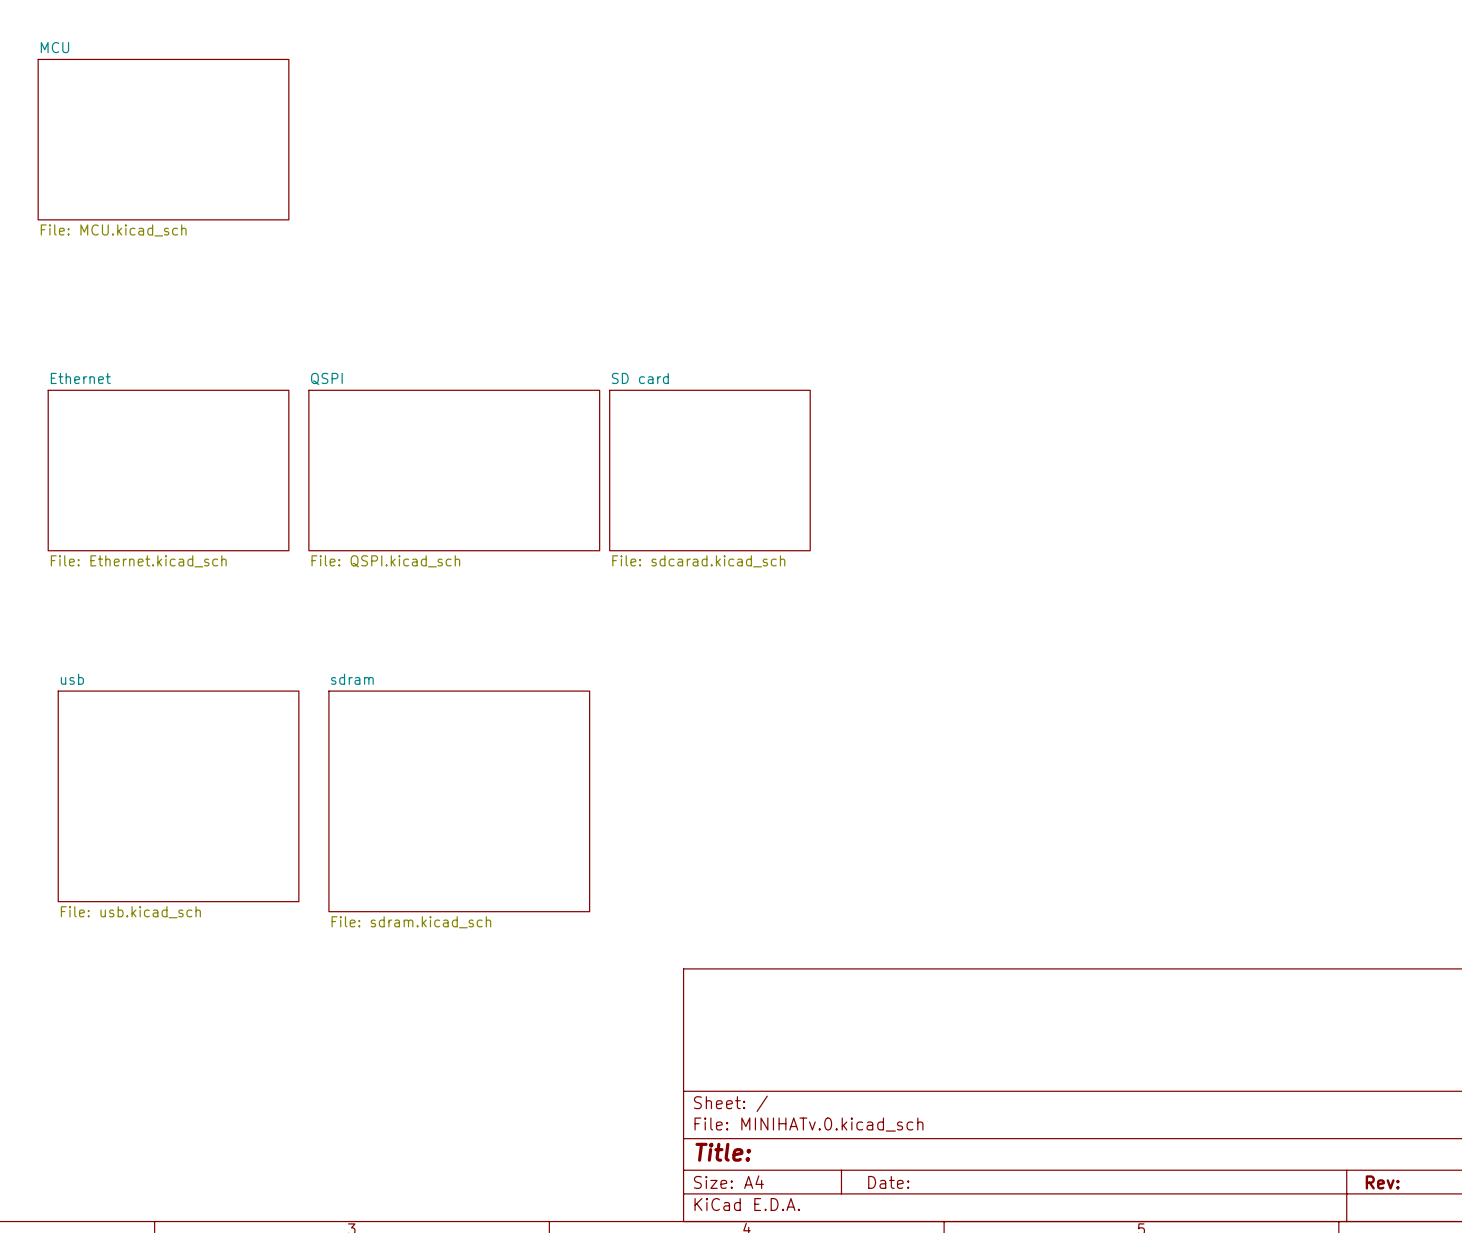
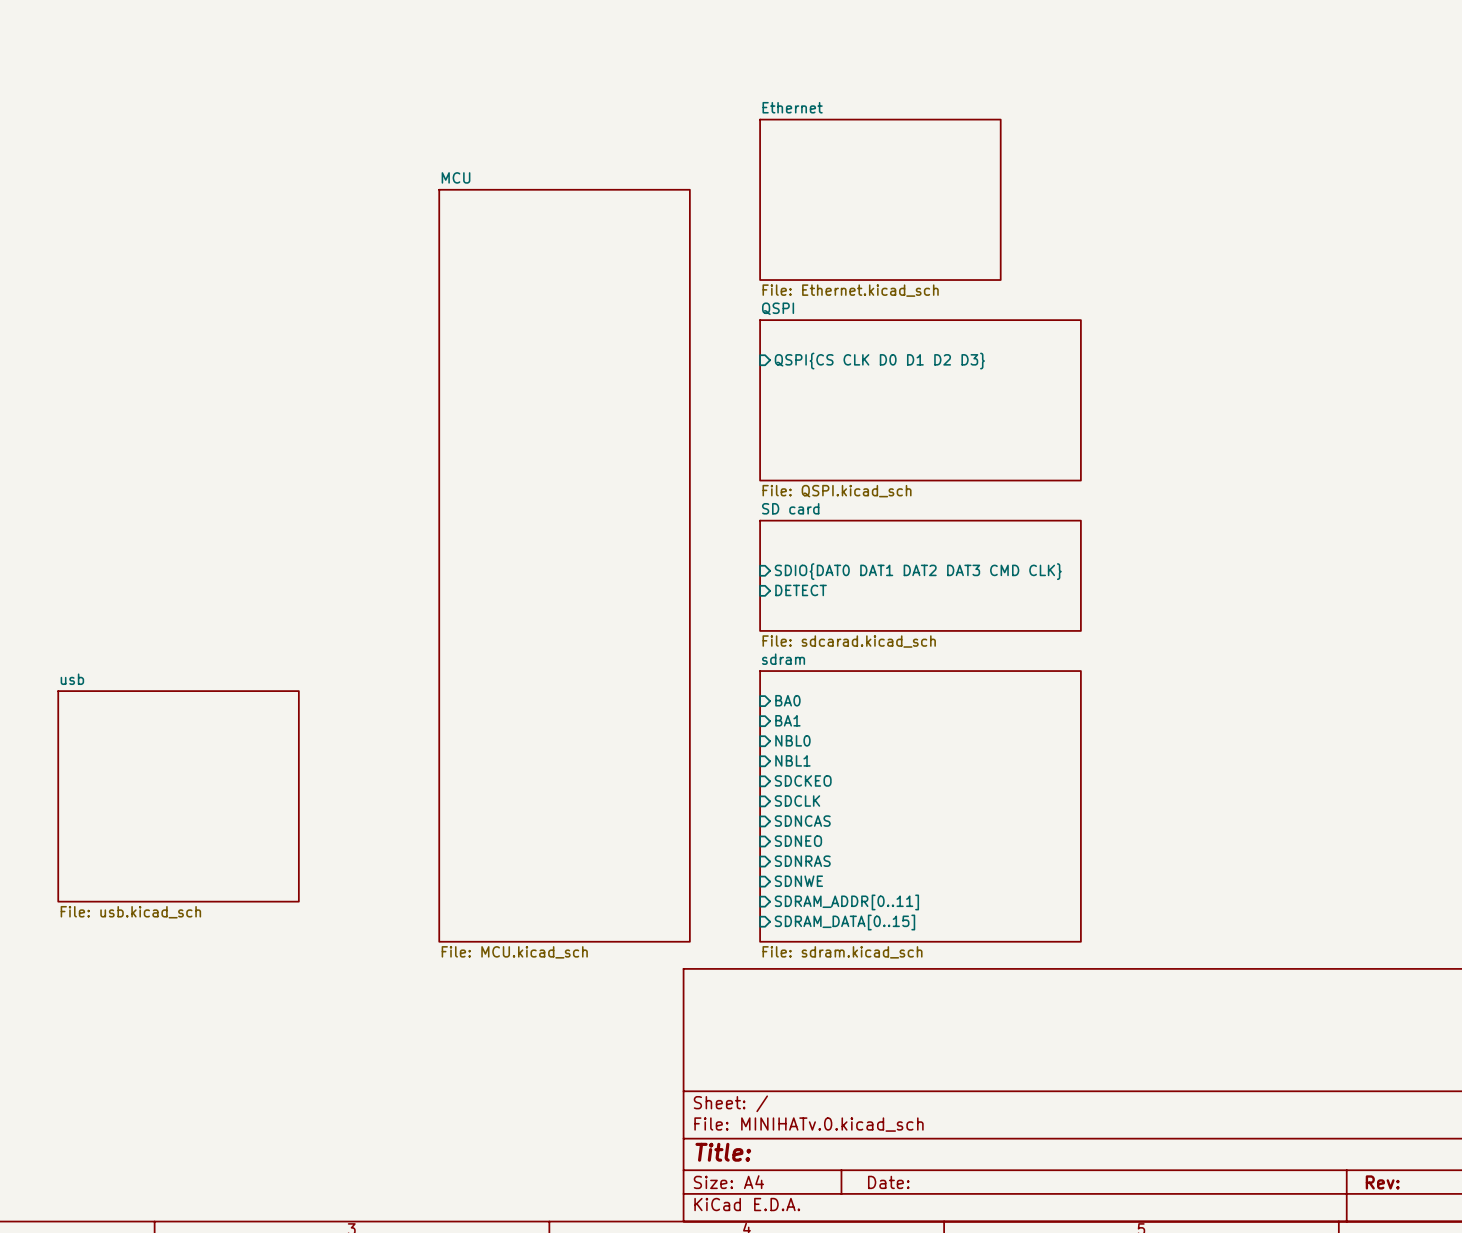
sheet MCU: File: MCU.kicad_sch (163, 139) -> none
sheet Ethernet: none -> File: Ethernet.kicad_sch (880, 199)
sheet pin: none -> QSPI{CS CLK D0 D1 D2 D3} (879, 361)
sheet QSPI: none -> File: QSPI.kicad_sch (920, 400)
sheet Ethernet: File: Ethernet.kicad_sch (168, 470) -> none
sheet QSPI: File: QSPI.kicad_sch (454, 470) -> none
sheet SD card: File: sdcarad.kicad_sch (709, 470) -> none
sheet MCU: none -> File: MCU.kicad_sch (564, 565)
sheet pin: none -> SDIO{DAT0 DAT1 DAT2 DAT3 CMD CLK} (918, 571)
sheet SD card: none -> File: sdcarad.kicad_sch (920, 575)
sheet pin: none -> DETECT (801, 590)
sheet pin: none -> BA0 (787, 700)
sheet pin: none -> BA1 (787, 720)
sheet pin: none -> NBL0 (792, 740)
sheet pin: none -> NBL1 (792, 760)
sheet pin: none -> SDCKEO (803, 780)
sheet sdram: File: sdram.kicad_sch (459, 801) -> none
sheet pin: none -> SDCLK (797, 801)
sheet sdram: none -> File: sdram.kicad_sch (920, 806)
sheet pin: none -> SDNCAS (802, 821)
sheet pin: none -> SDNEO (798, 841)
sheet pin: none -> SDNRAS (802, 861)
sheet pin: none -> SDNWE (798, 881)
sheet pin: none -> SDRAM_ADDR[0..11] (846, 902)
sheet pin: none -> SDRAM_DATA[0..15] (844, 922)

